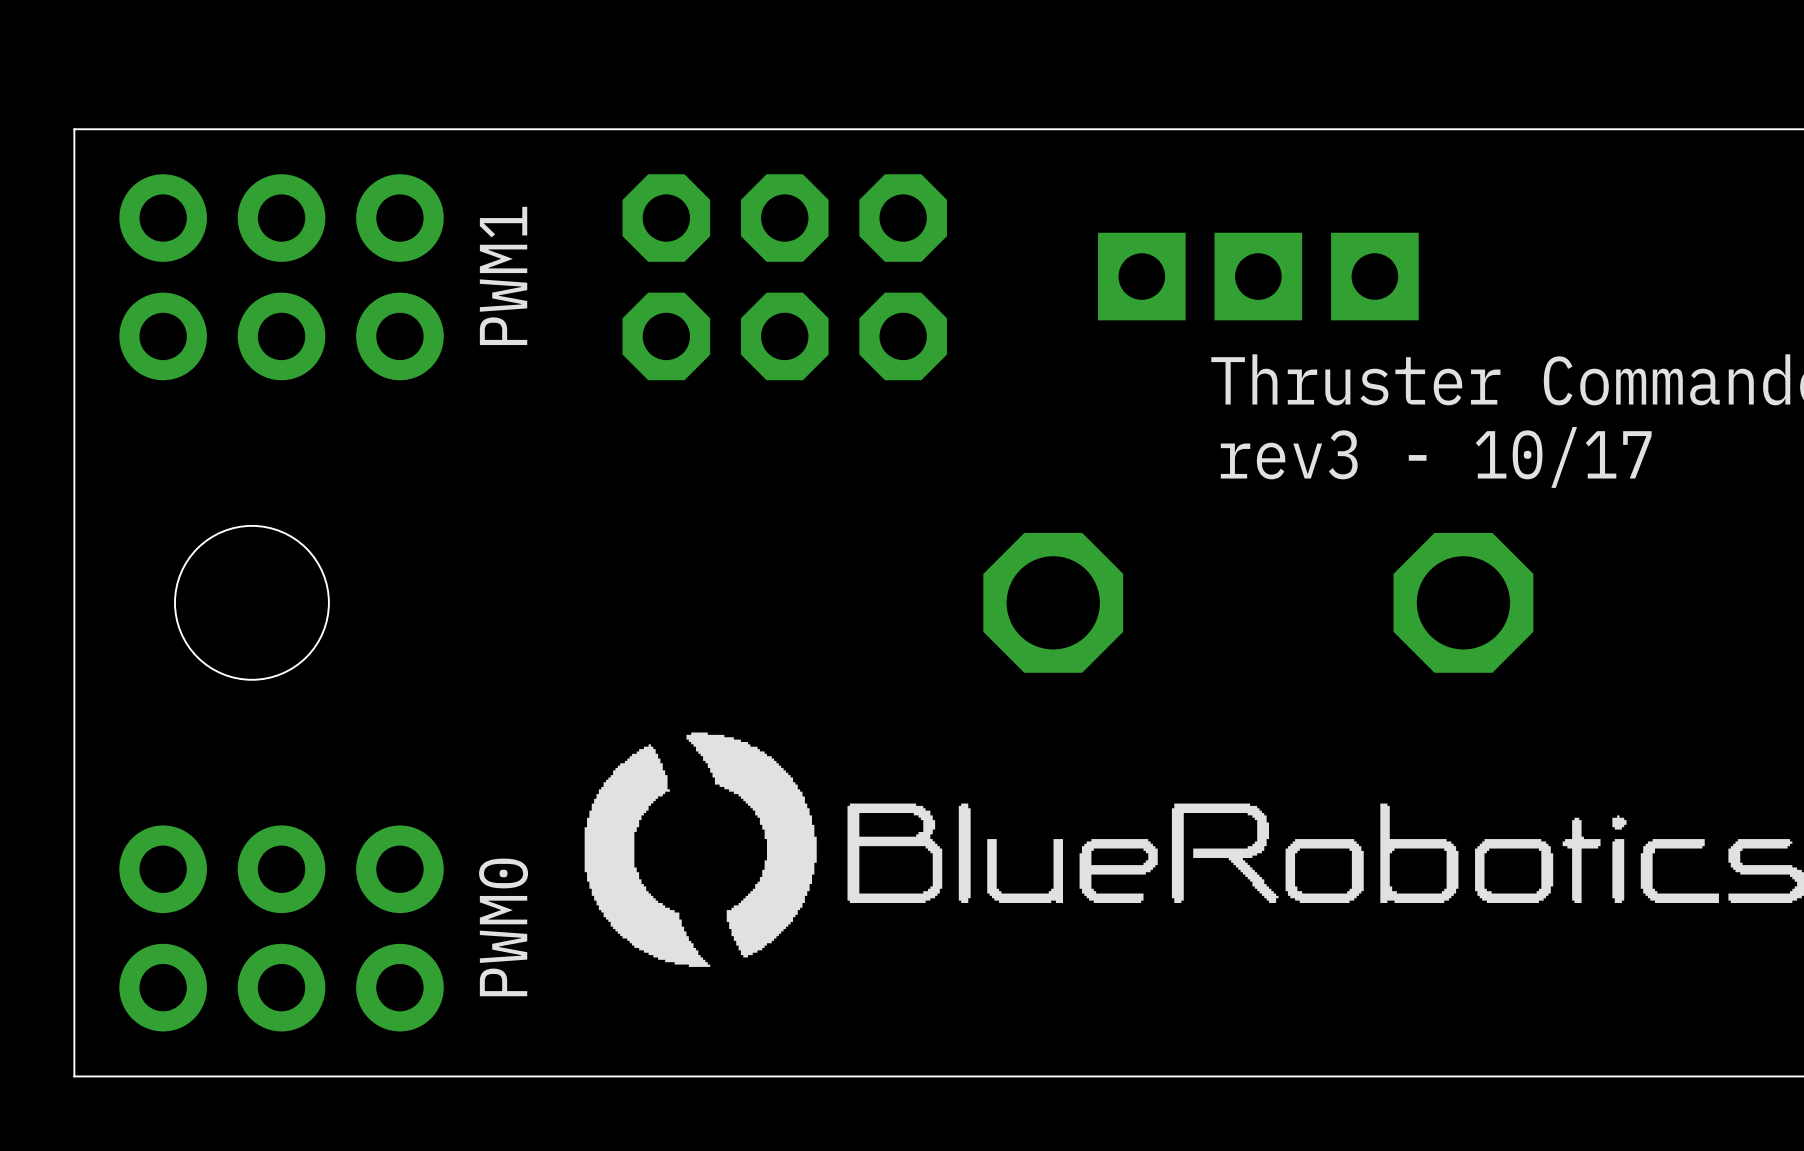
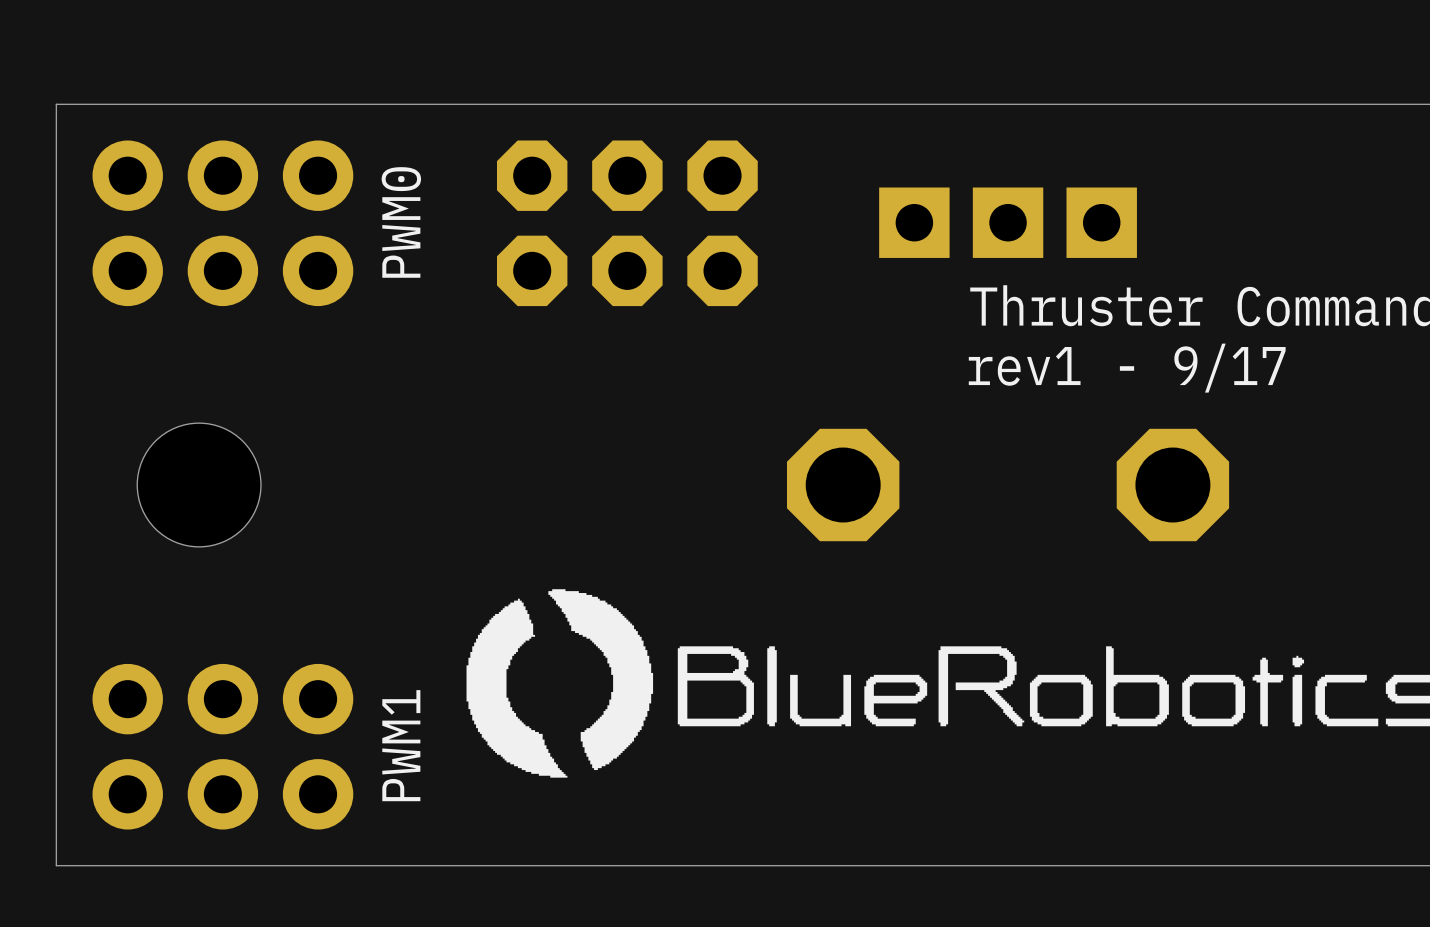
text: PWM1 (503, 275) -> PWM0 (401, 222)
text: rev3 - 10/17 (1436, 457) -> rev1 - 9/17 (1127, 368)
text: PWM0 (503, 927) -> PWM1 (401, 745)

